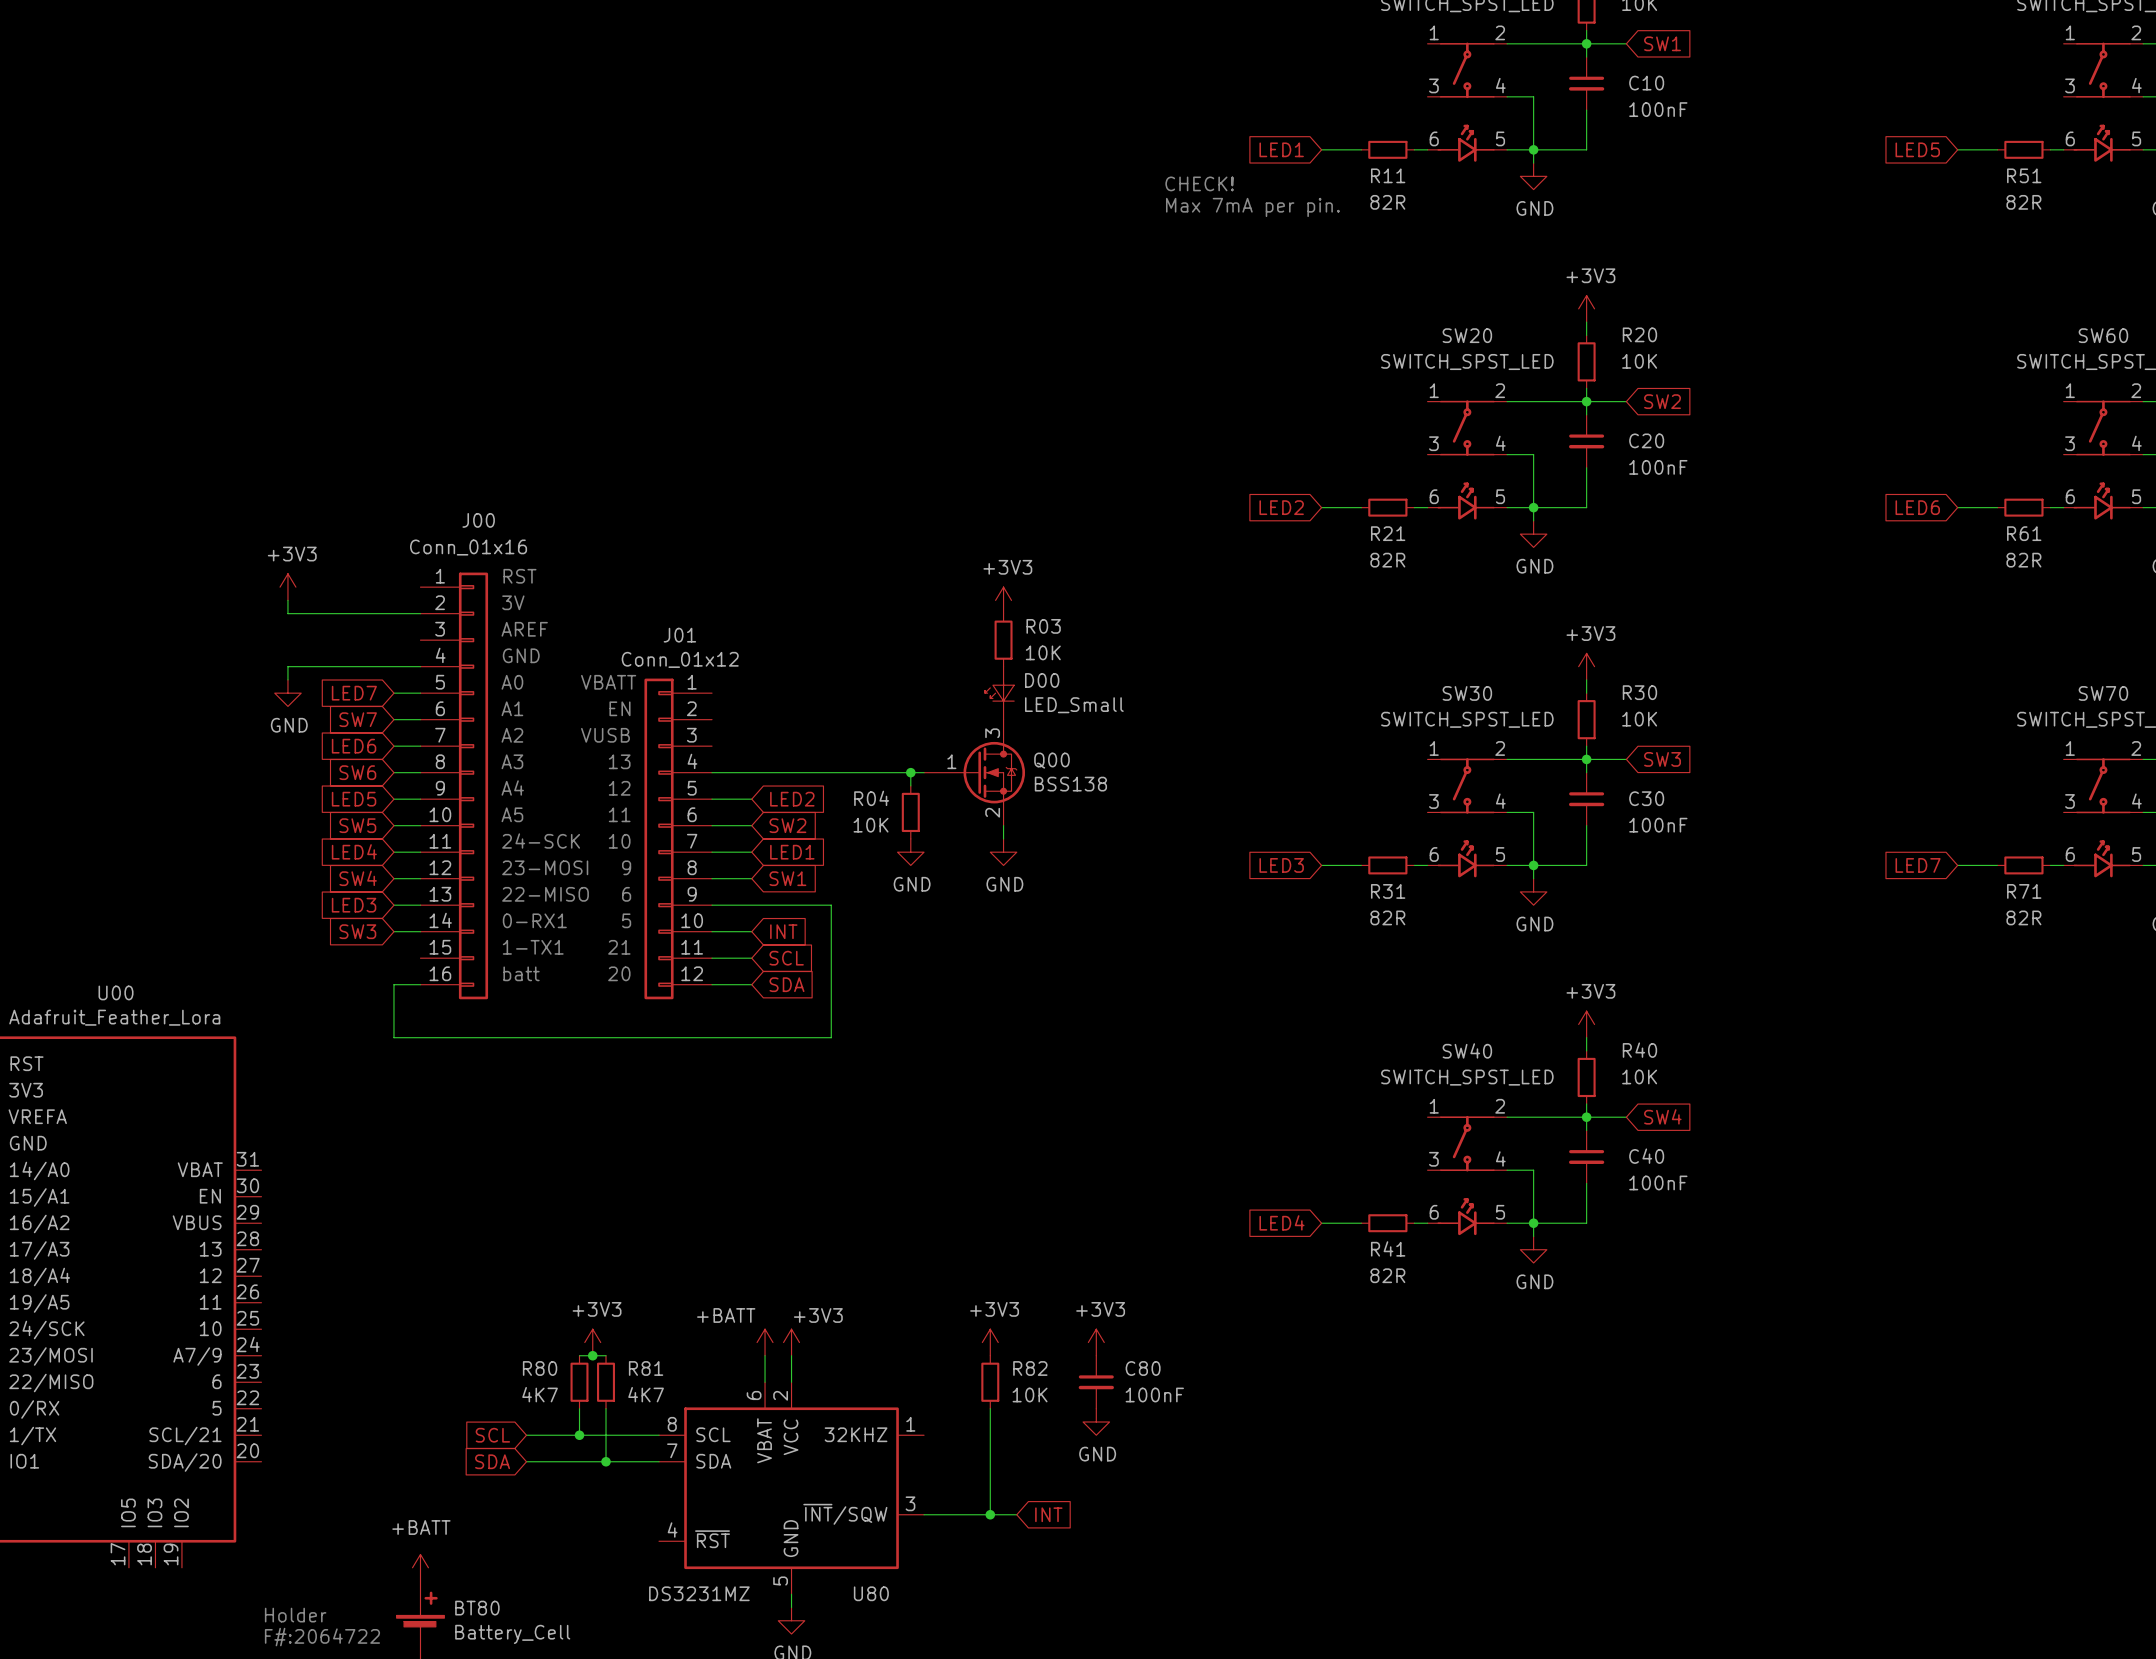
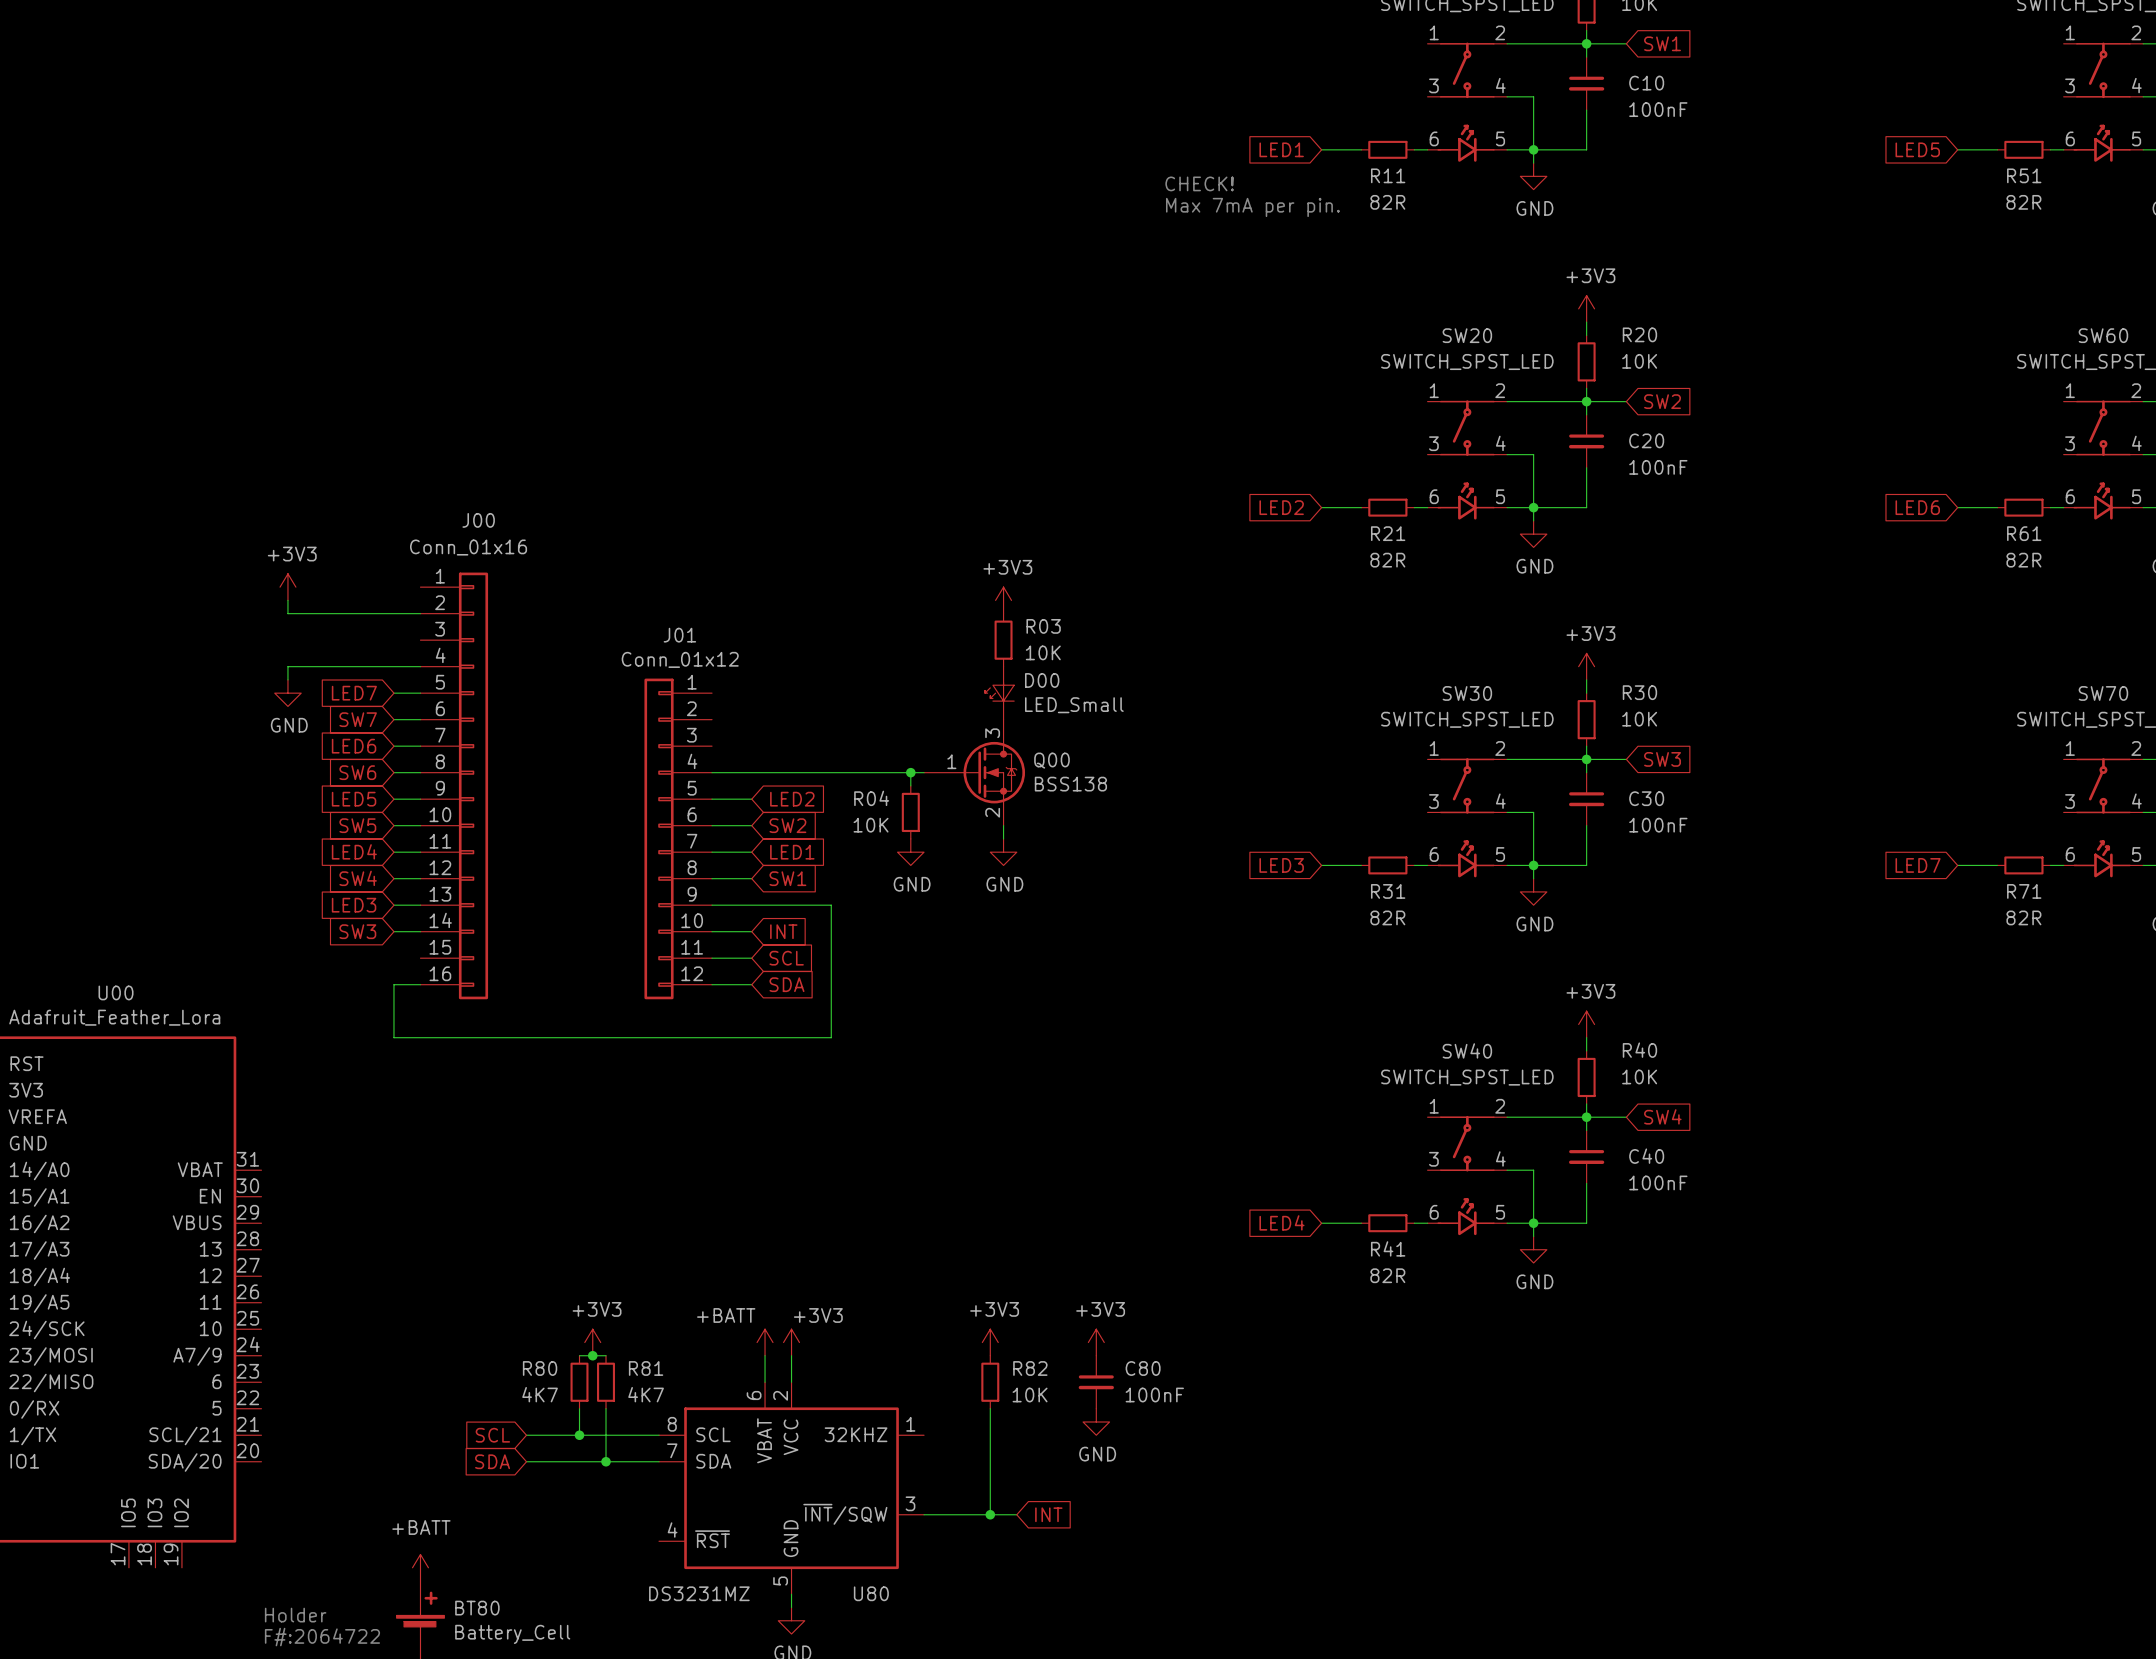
text: RST (519, 576) -> none
text: 3V (513, 602) -> none
text: AREF (524, 629) -> none
text: GND (521, 655) -> none
text: A0 (512, 682) -> none
text: VBATT (608, 682) -> none
text: A1 (512, 708) -> none
text: EN (619, 708) -> none
text: A2 (512, 735) -> none
text: VUSB (605, 735) -> none
text: A3 (512, 761) -> none
text: 13 (619, 761) -> none
text: A4 (512, 788) -> none
text: 12 (619, 788) -> none
text: A5 (512, 814) -> none
text: 11 (619, 814) -> none
text: 24-SCK (541, 841) -> none
text: 10 (619, 841) -> none
text: 23-MOSI (545, 867) -> none
text: 9 (626, 867) -> none
text: 22-MISO (545, 894) -> none
text: 6 (626, 894) -> none
text: 0-RX1 (534, 920) -> none
text: 5 (626, 920) -> none
text: 1-TX1 (533, 947) -> none
text: 21 (619, 947) -> none
text: batt (521, 973) -> none
text: 20 (619, 973) -> none

